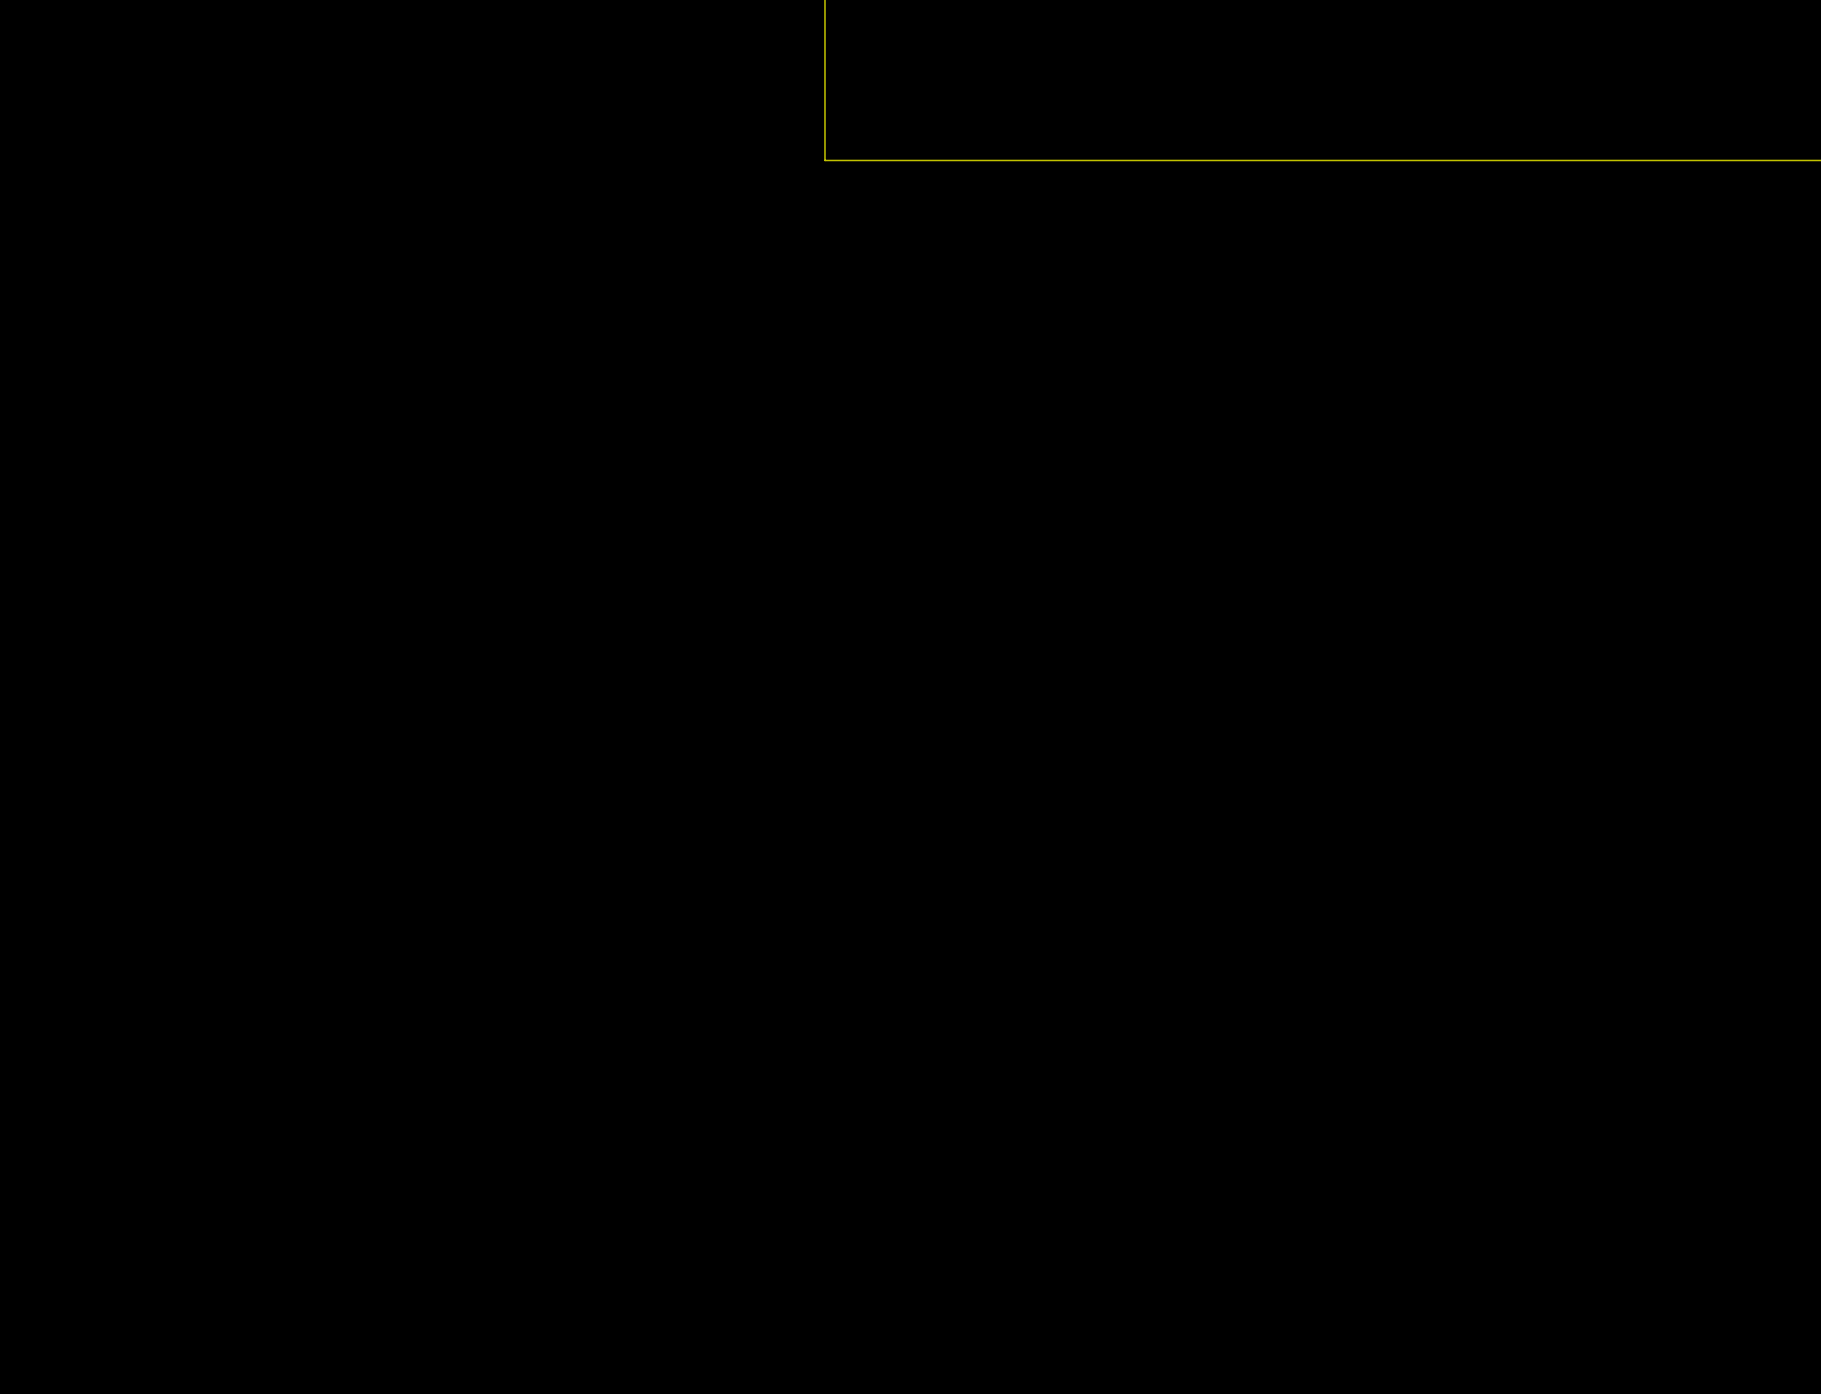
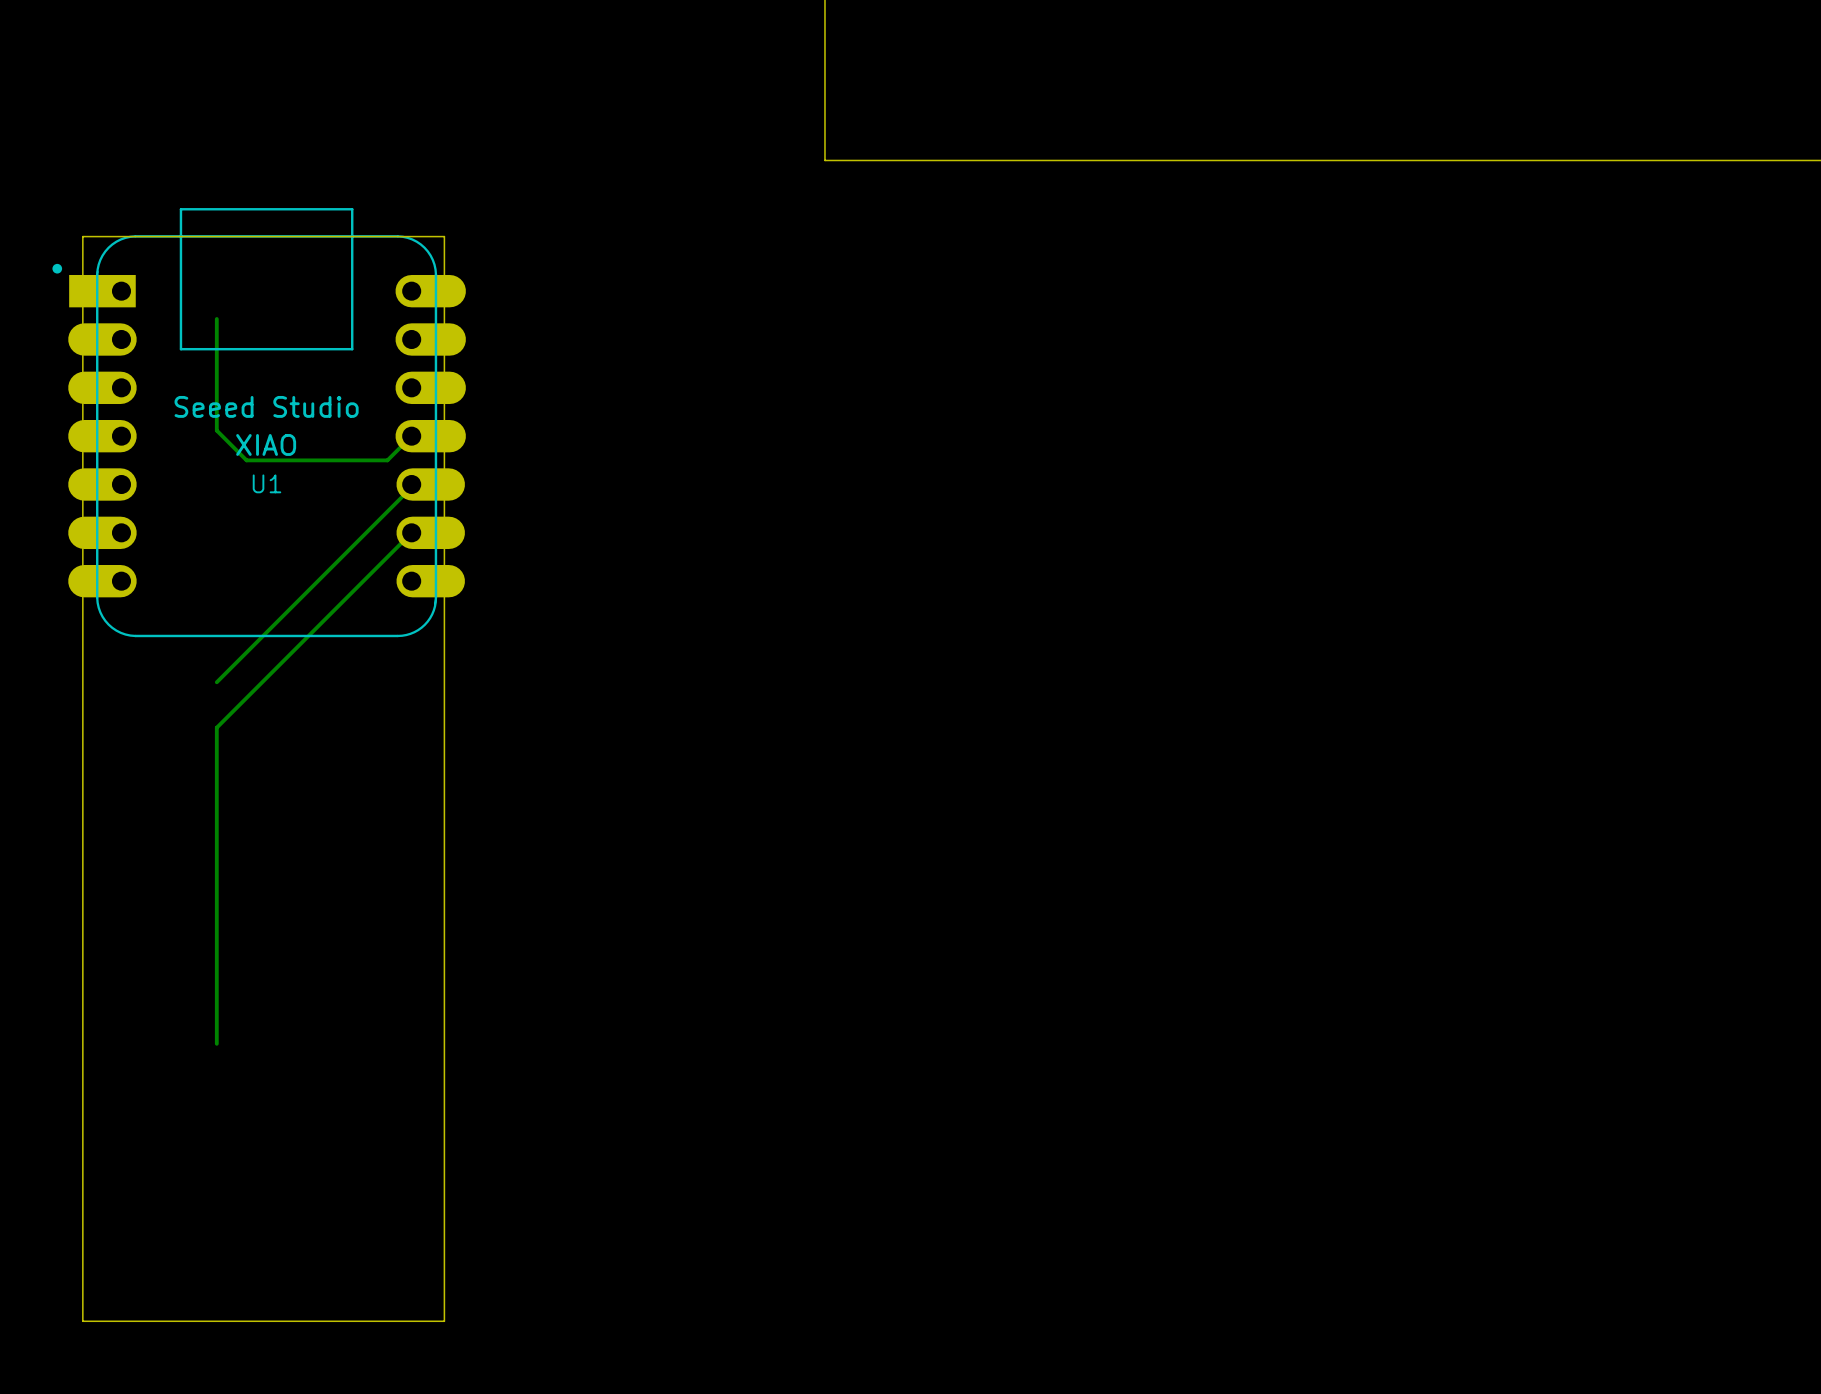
board edge: none -> (444, 236) (82, 236) (82, 1321) (444, 1321) (444, 236)
track: none -> (216, 318) (216, 430) (246, 460) (387, 460) (411, 436)
U1: none -> (259, 422)
track: none -> (411, 484) (411, 487) (216, 682)
track: none -> (411, 532) (216, 727) (216, 1043)

